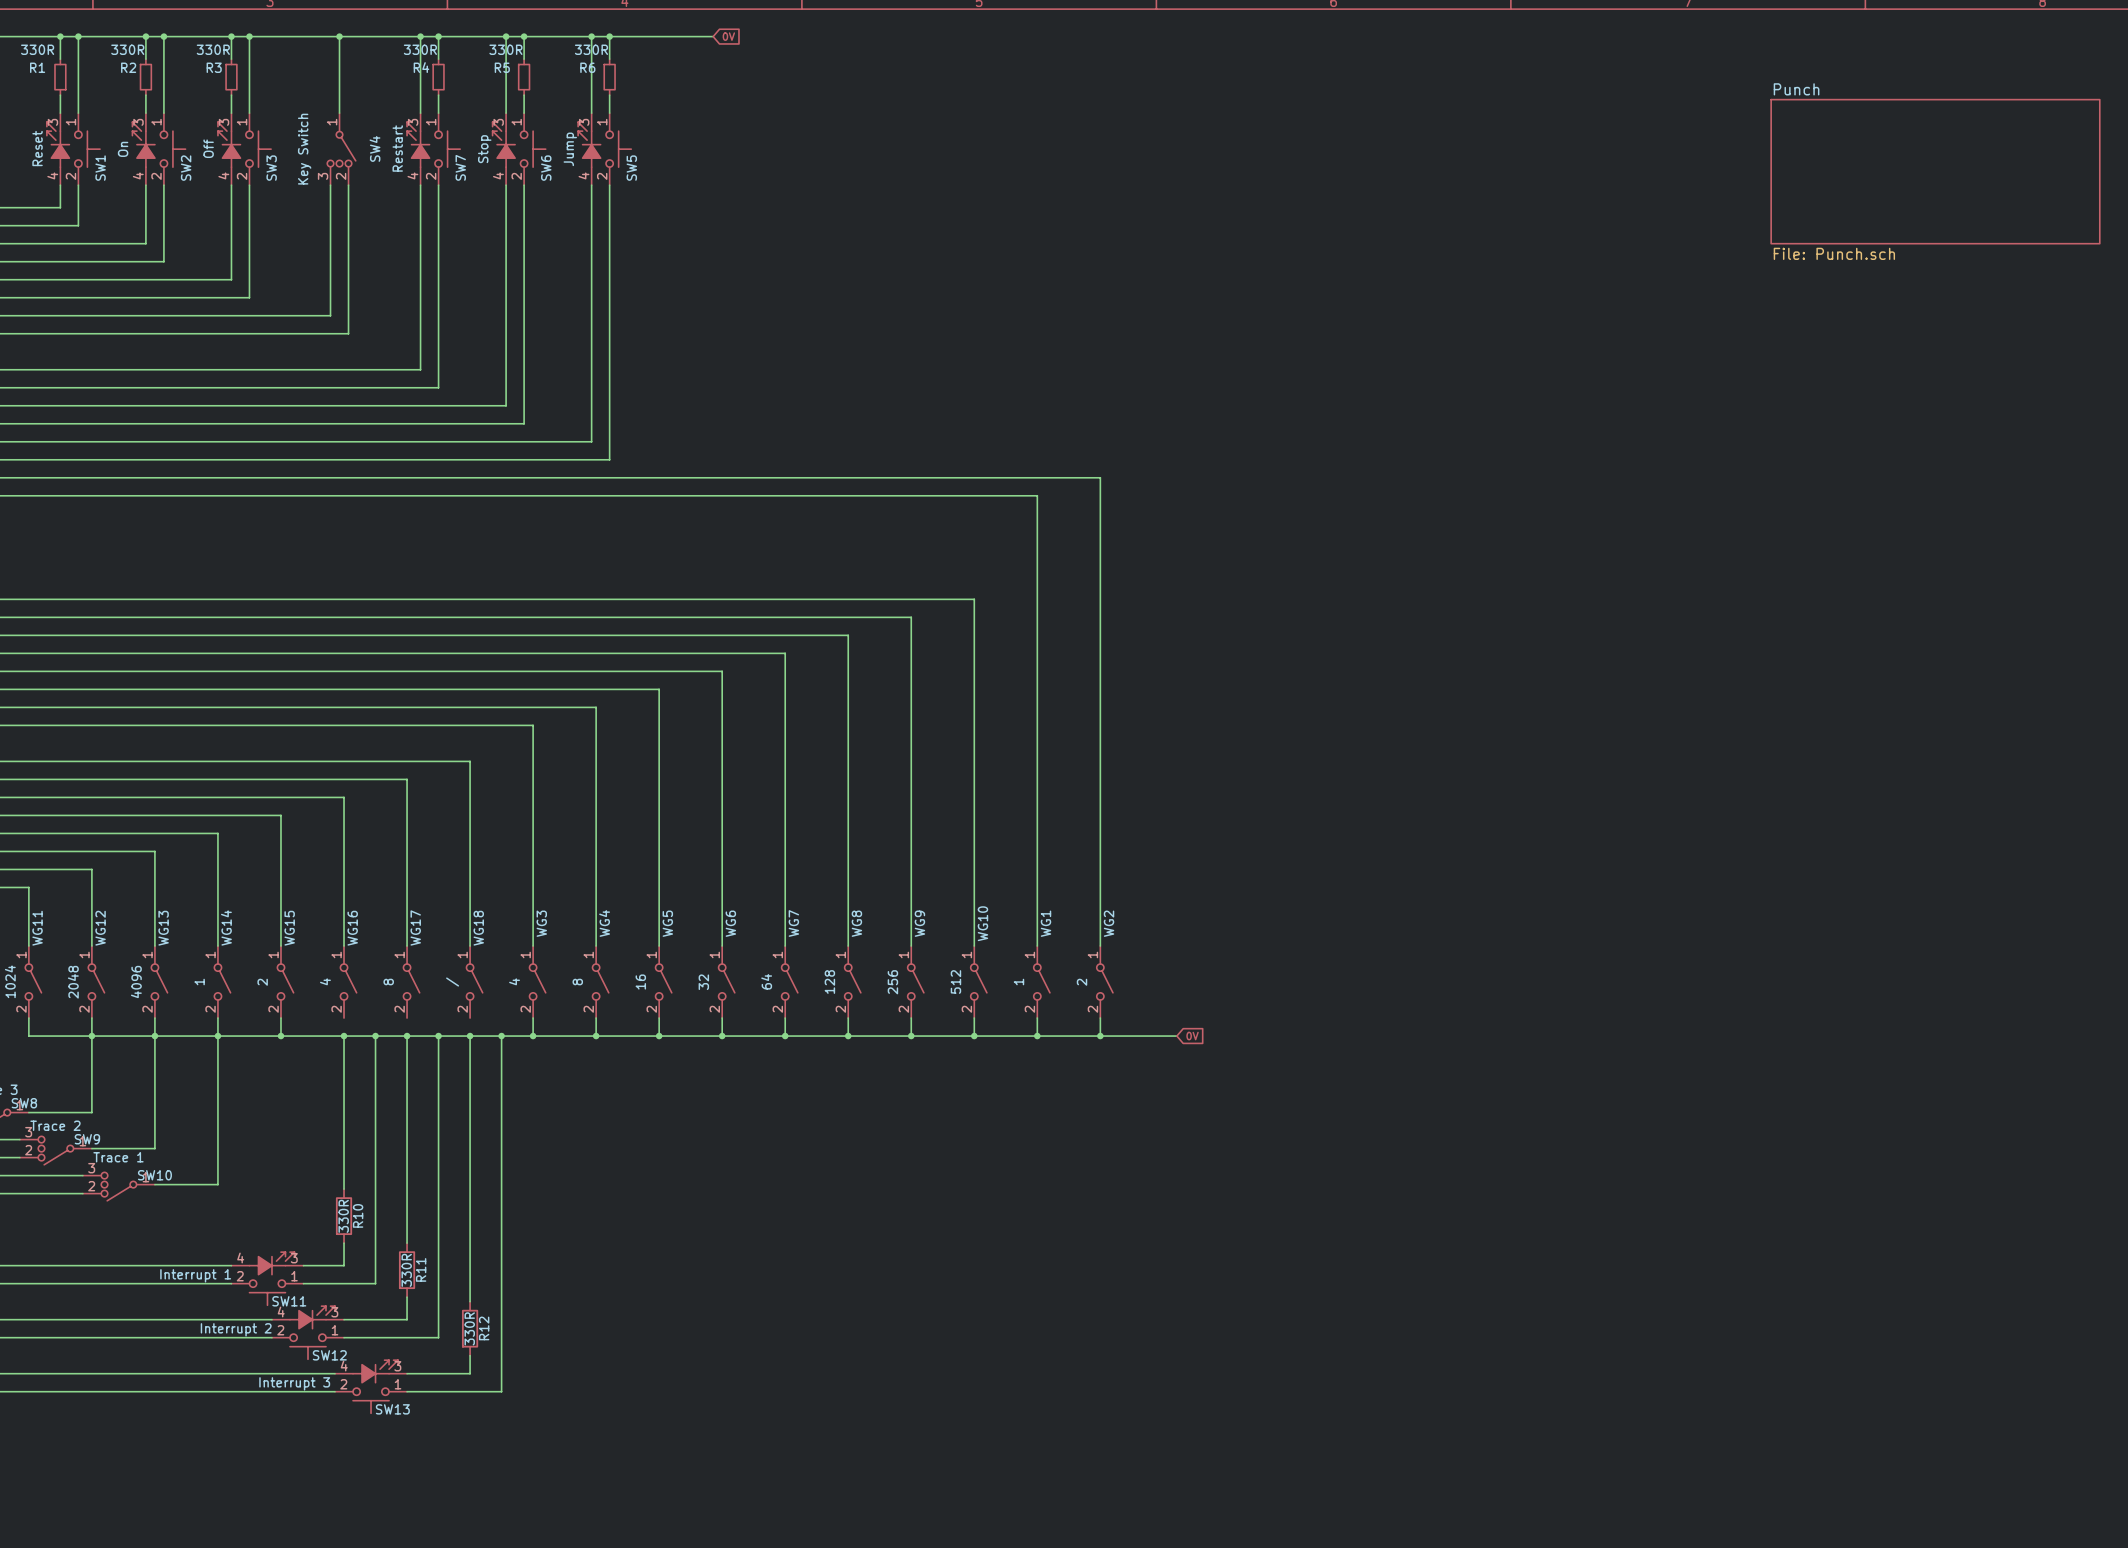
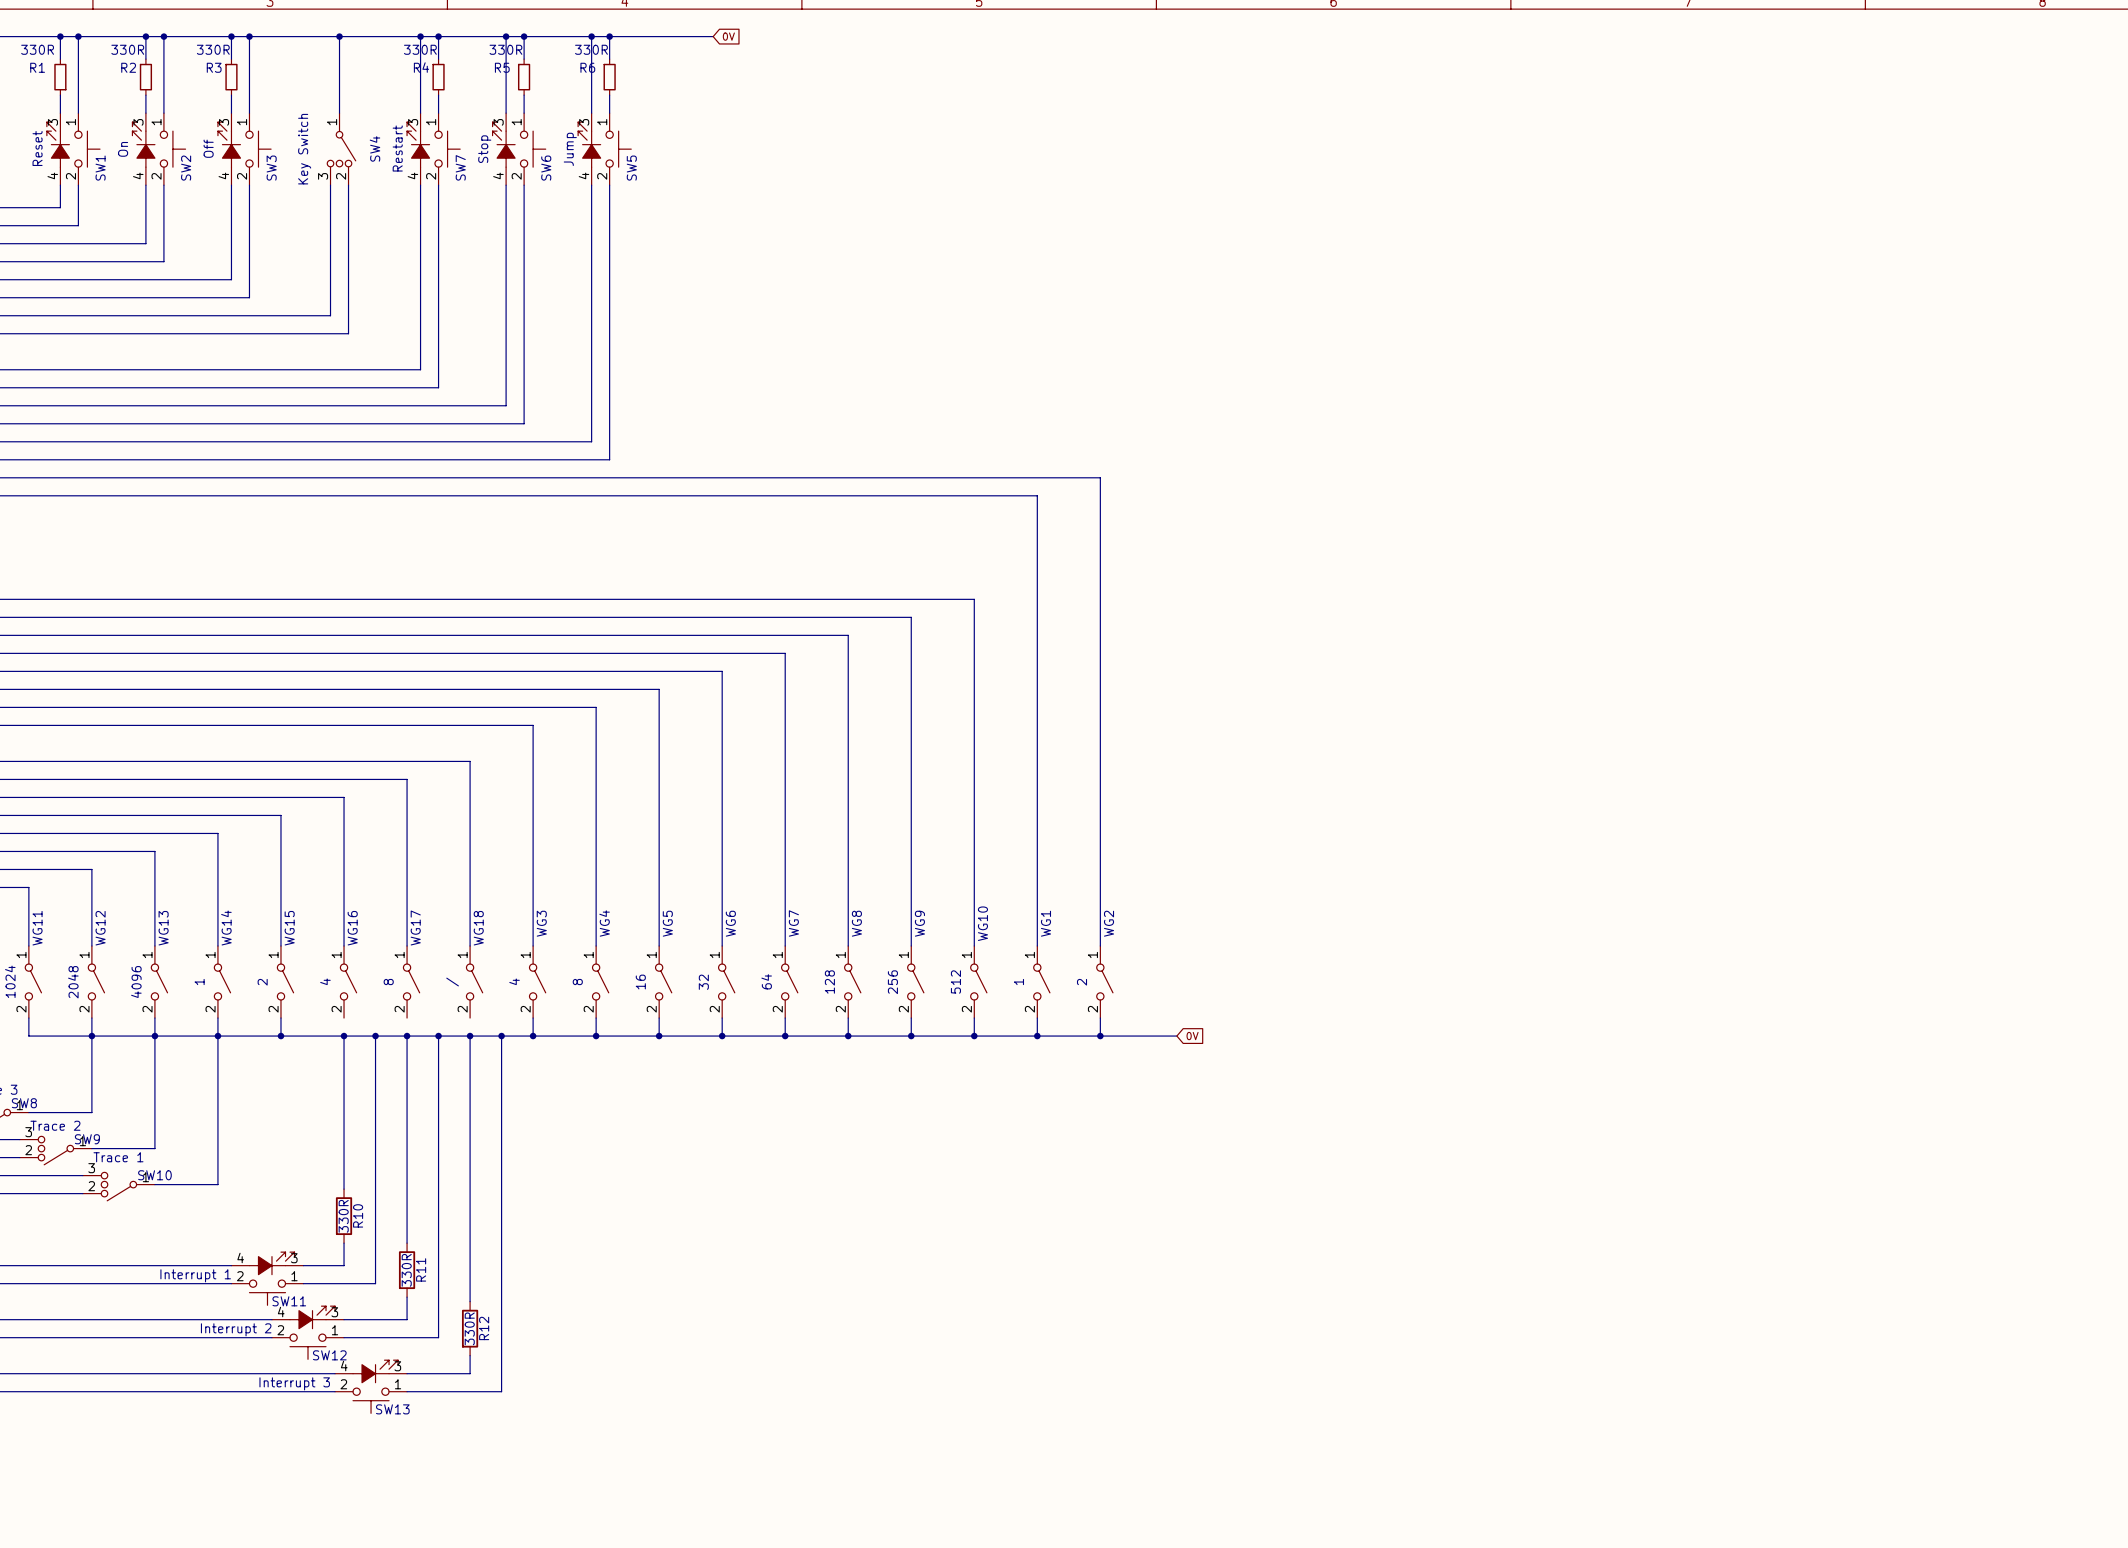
sheet Punch: File: Punch.sch (1935, 171) -> none

